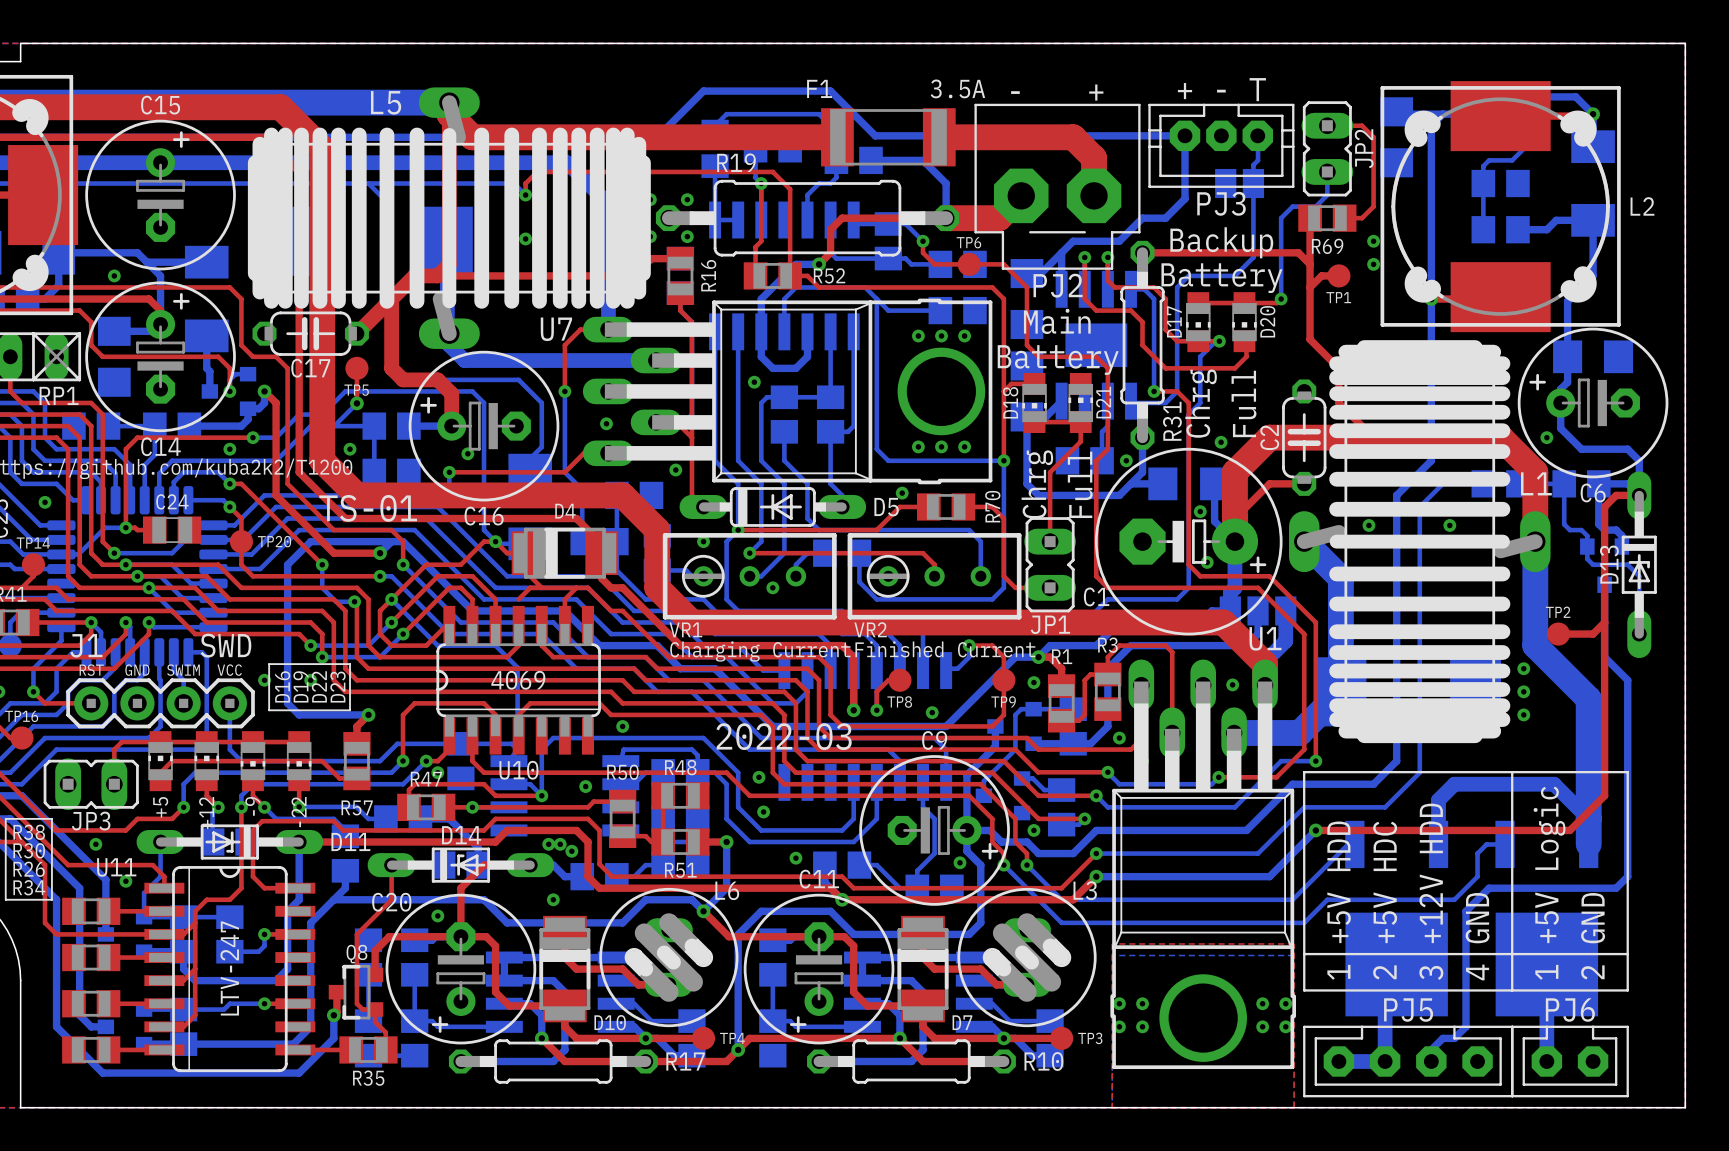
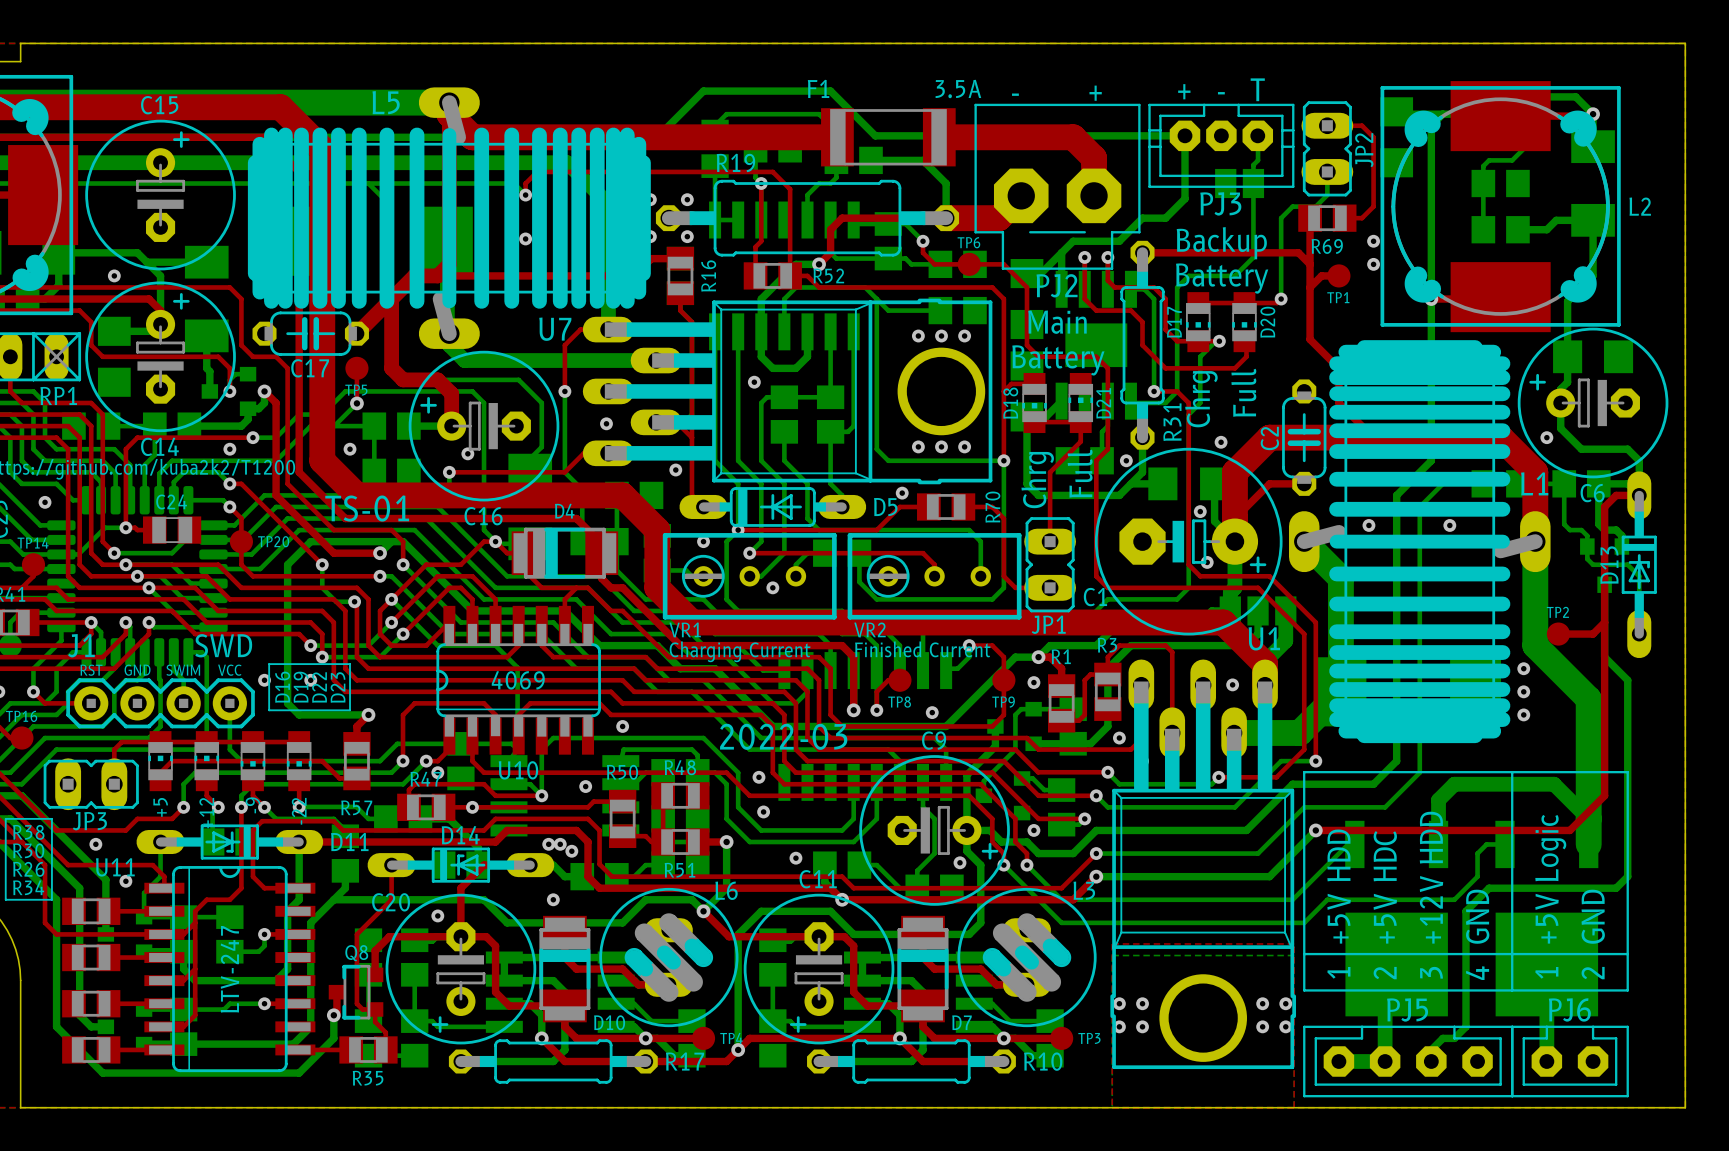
top track: (541, 587) (530, 587) (518, 599) -> none

